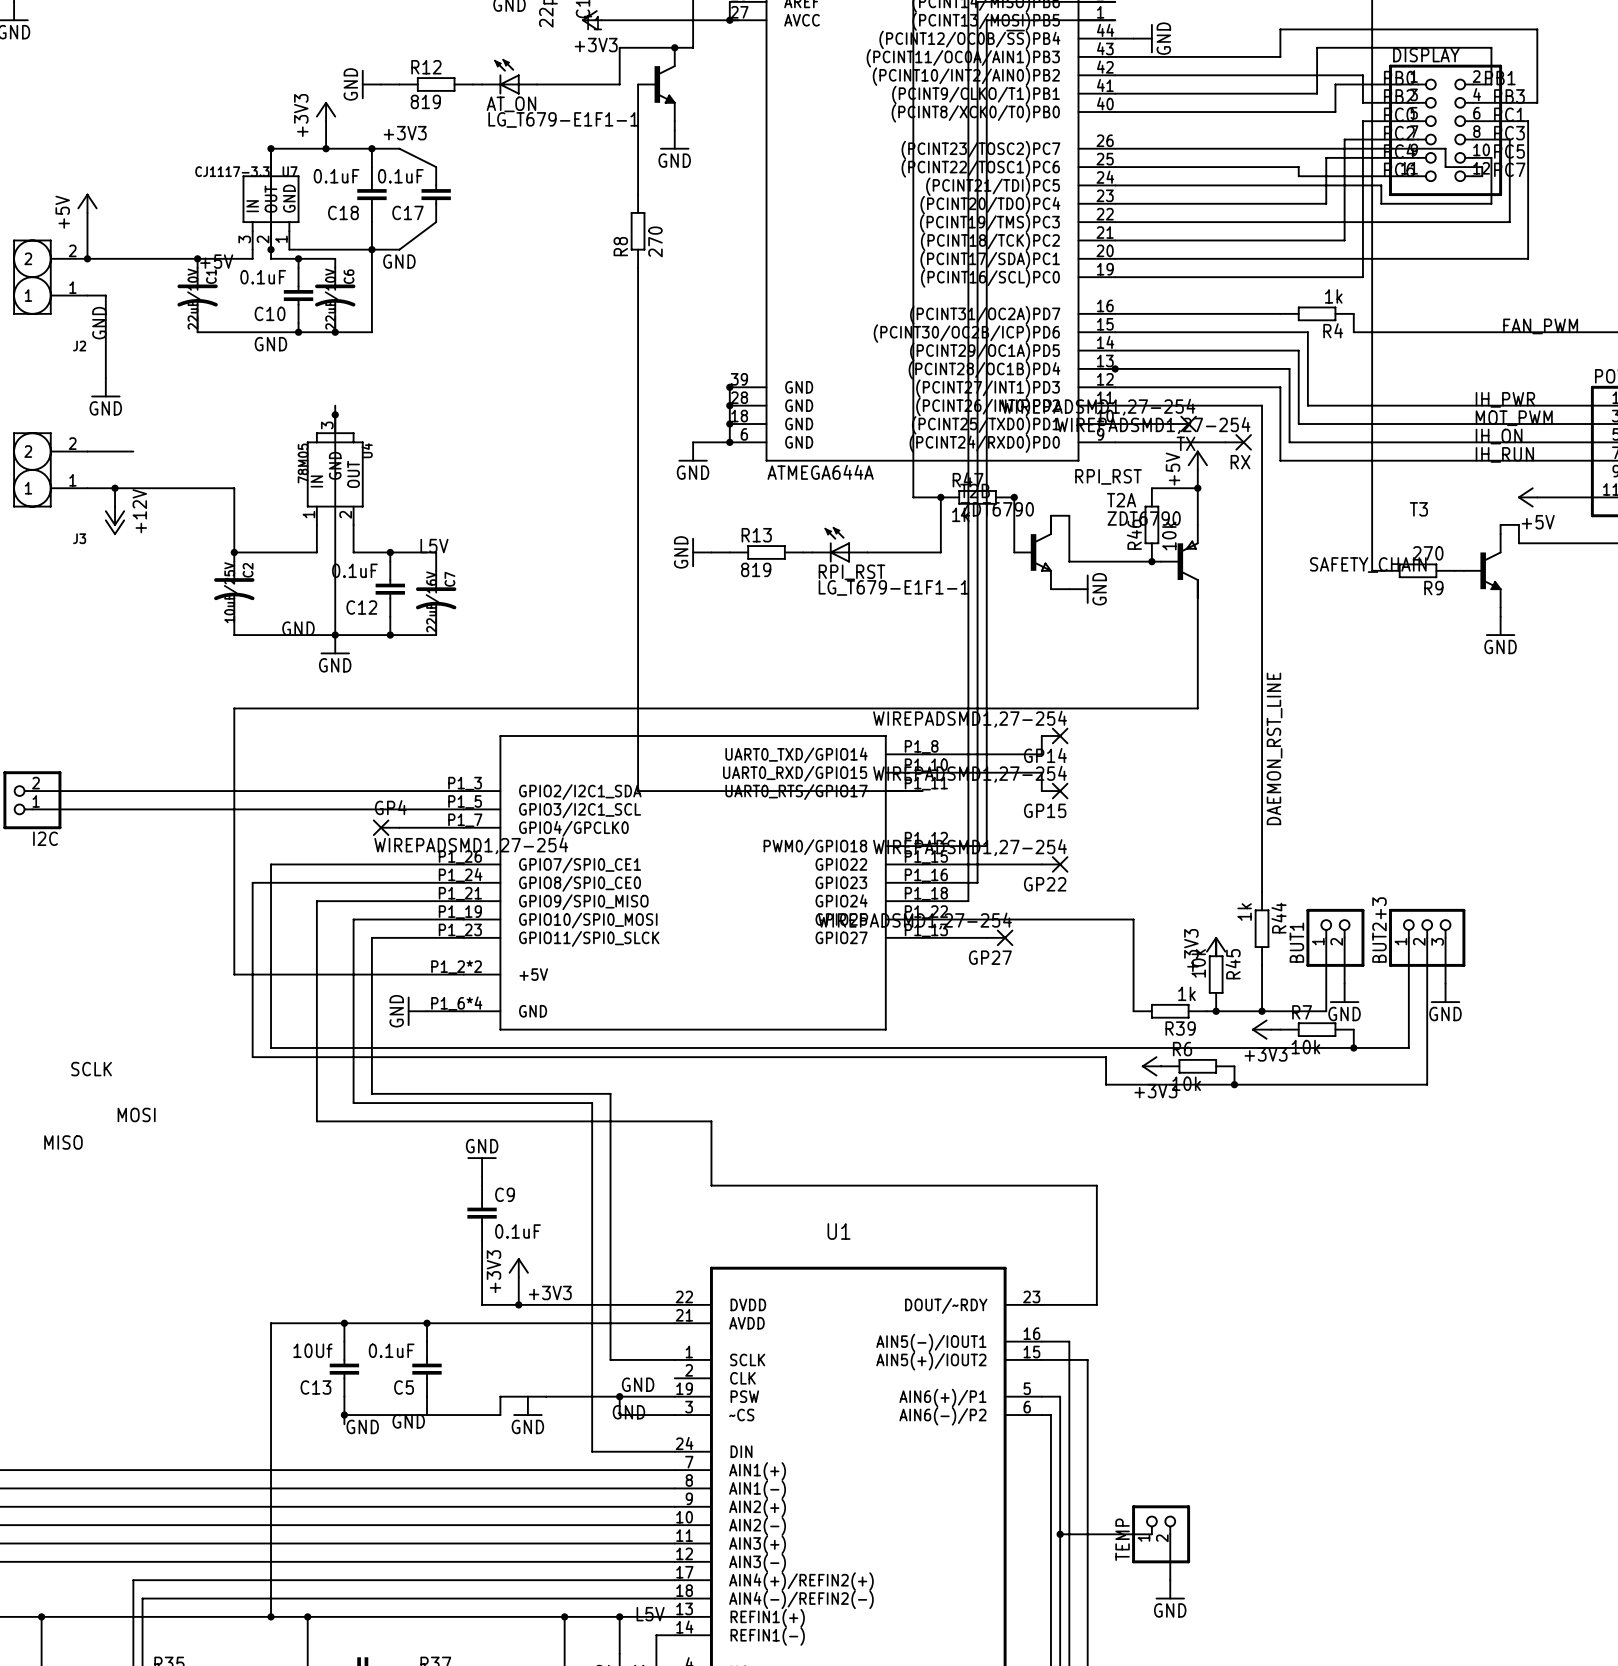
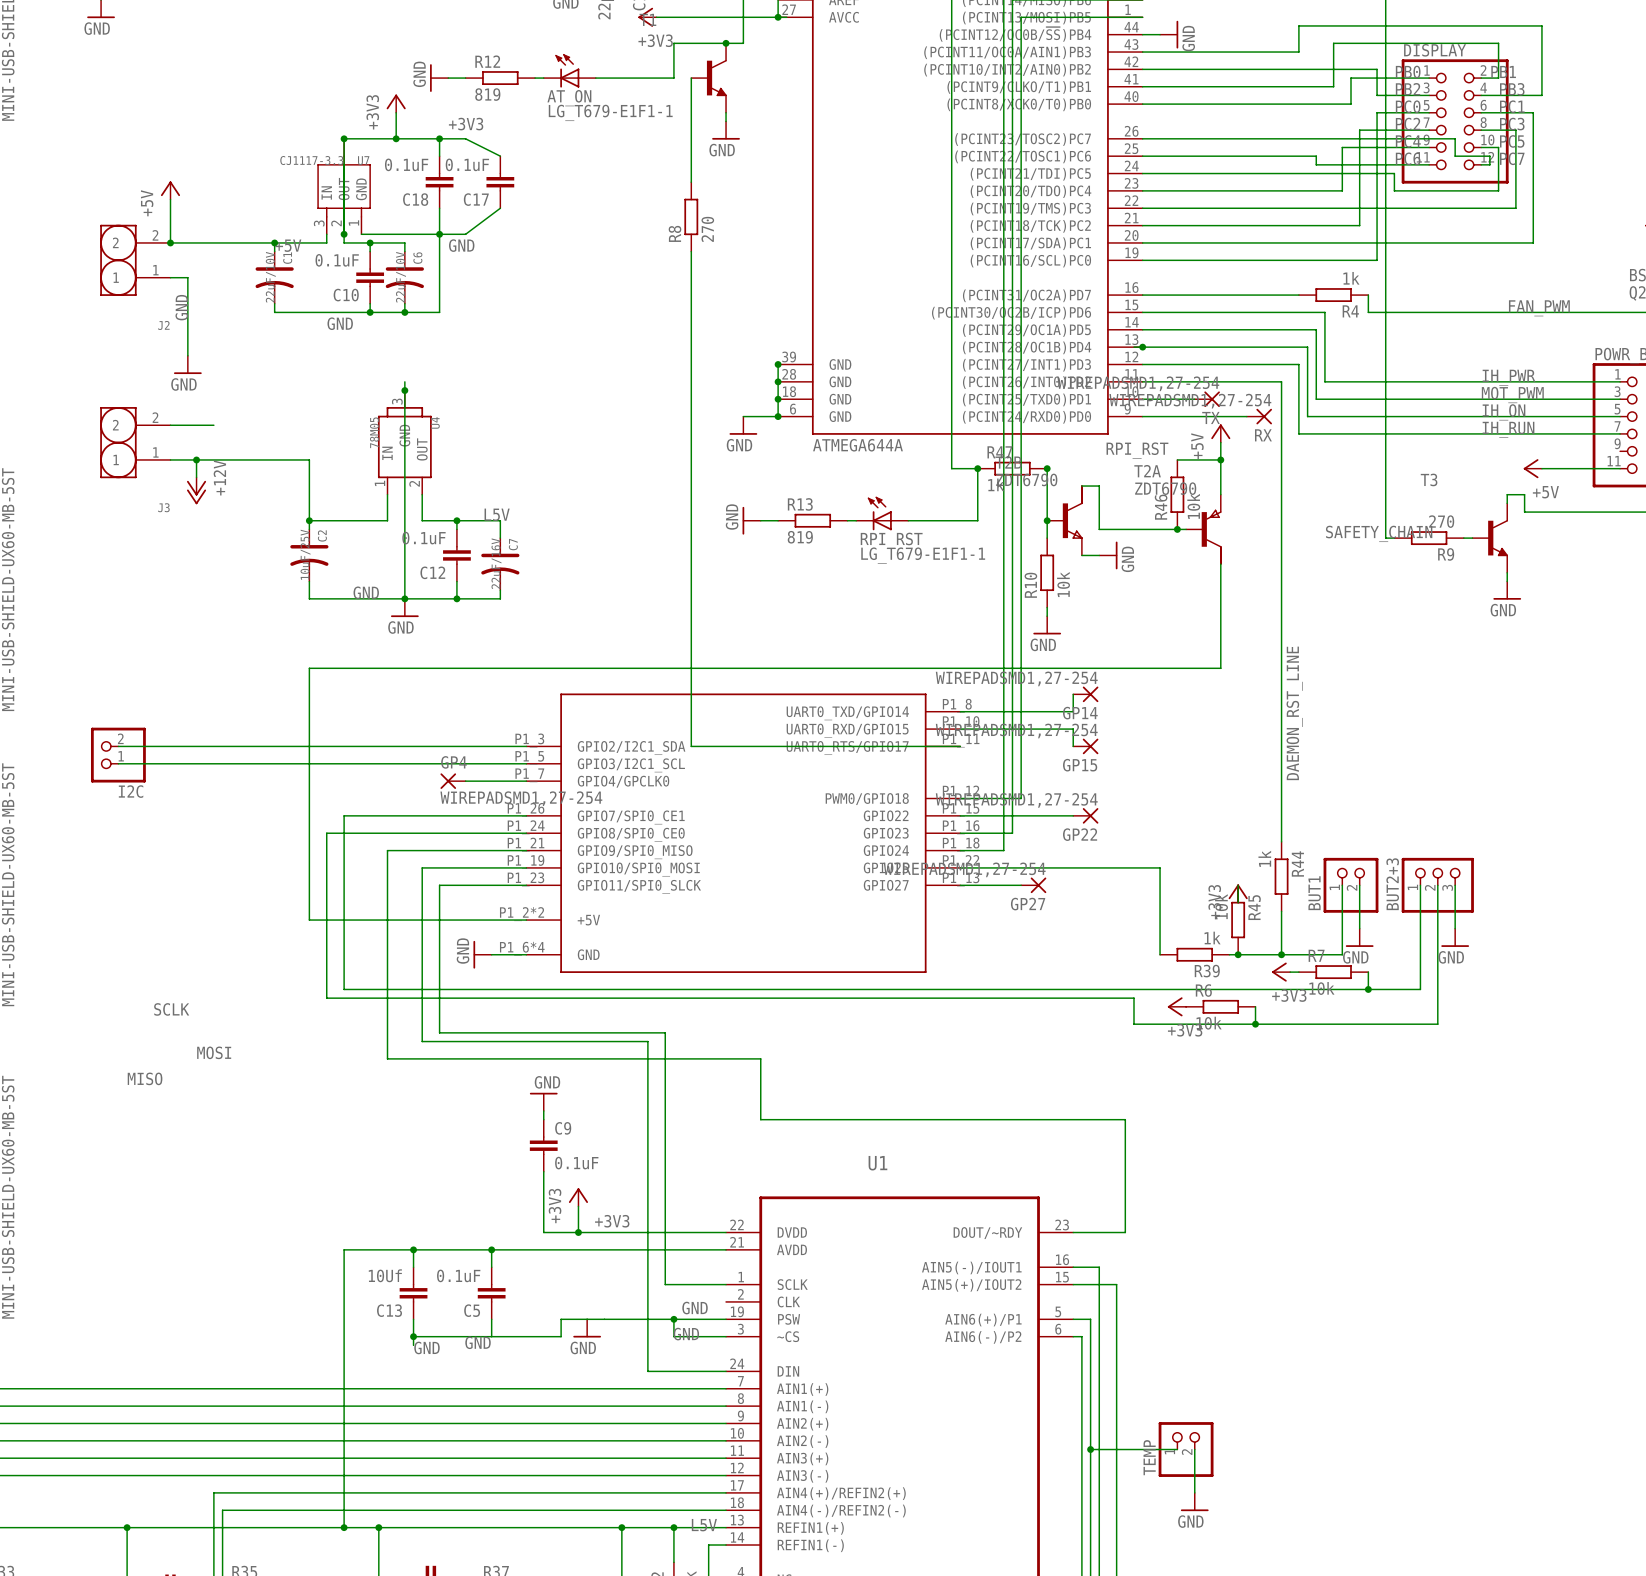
wire: none -> (1047, 520) (1047, 538)
junction: none -> (1047, 520)
R10: none -> 10k (1047, 572)
wire: none -> (1047, 607) (1047, 616)
power symbol: none -> GND (1047, 625)

